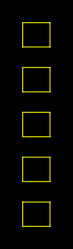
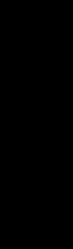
part: (36, 34) -> none
part: (36, 79) -> none
part: (36, 124) -> none
part: (36, 169) -> none
part: (36, 214) -> none

